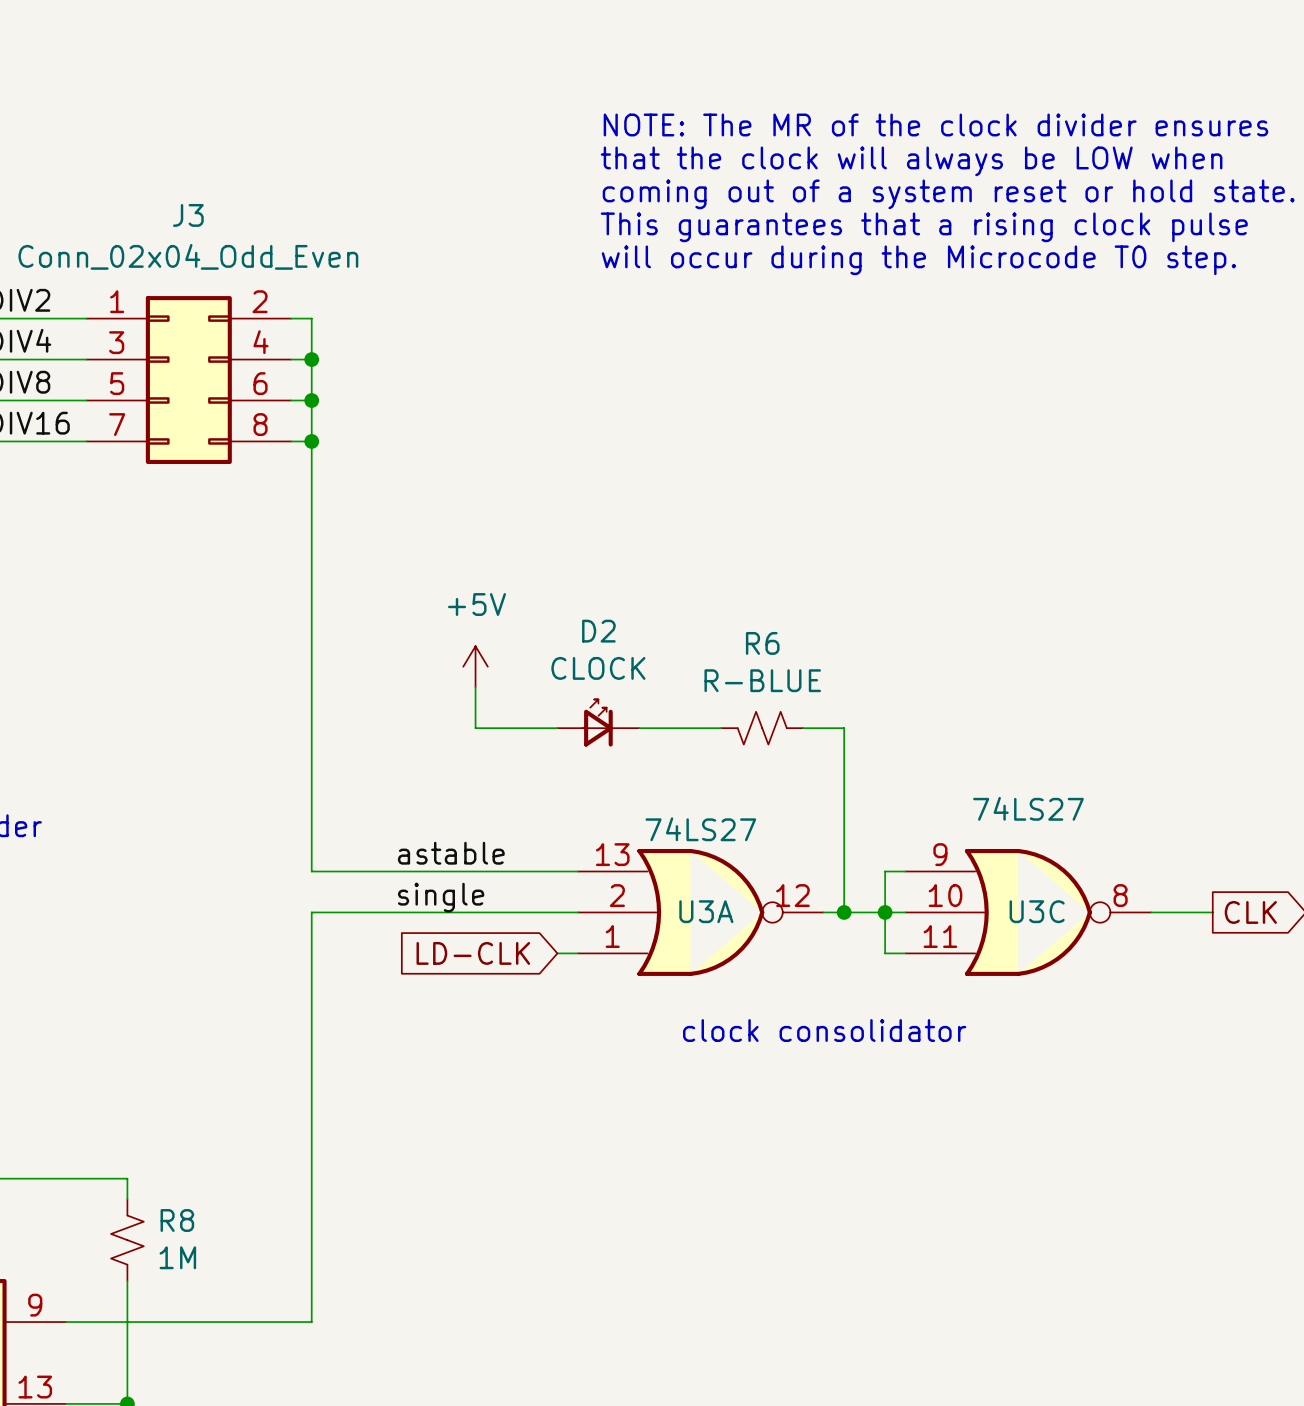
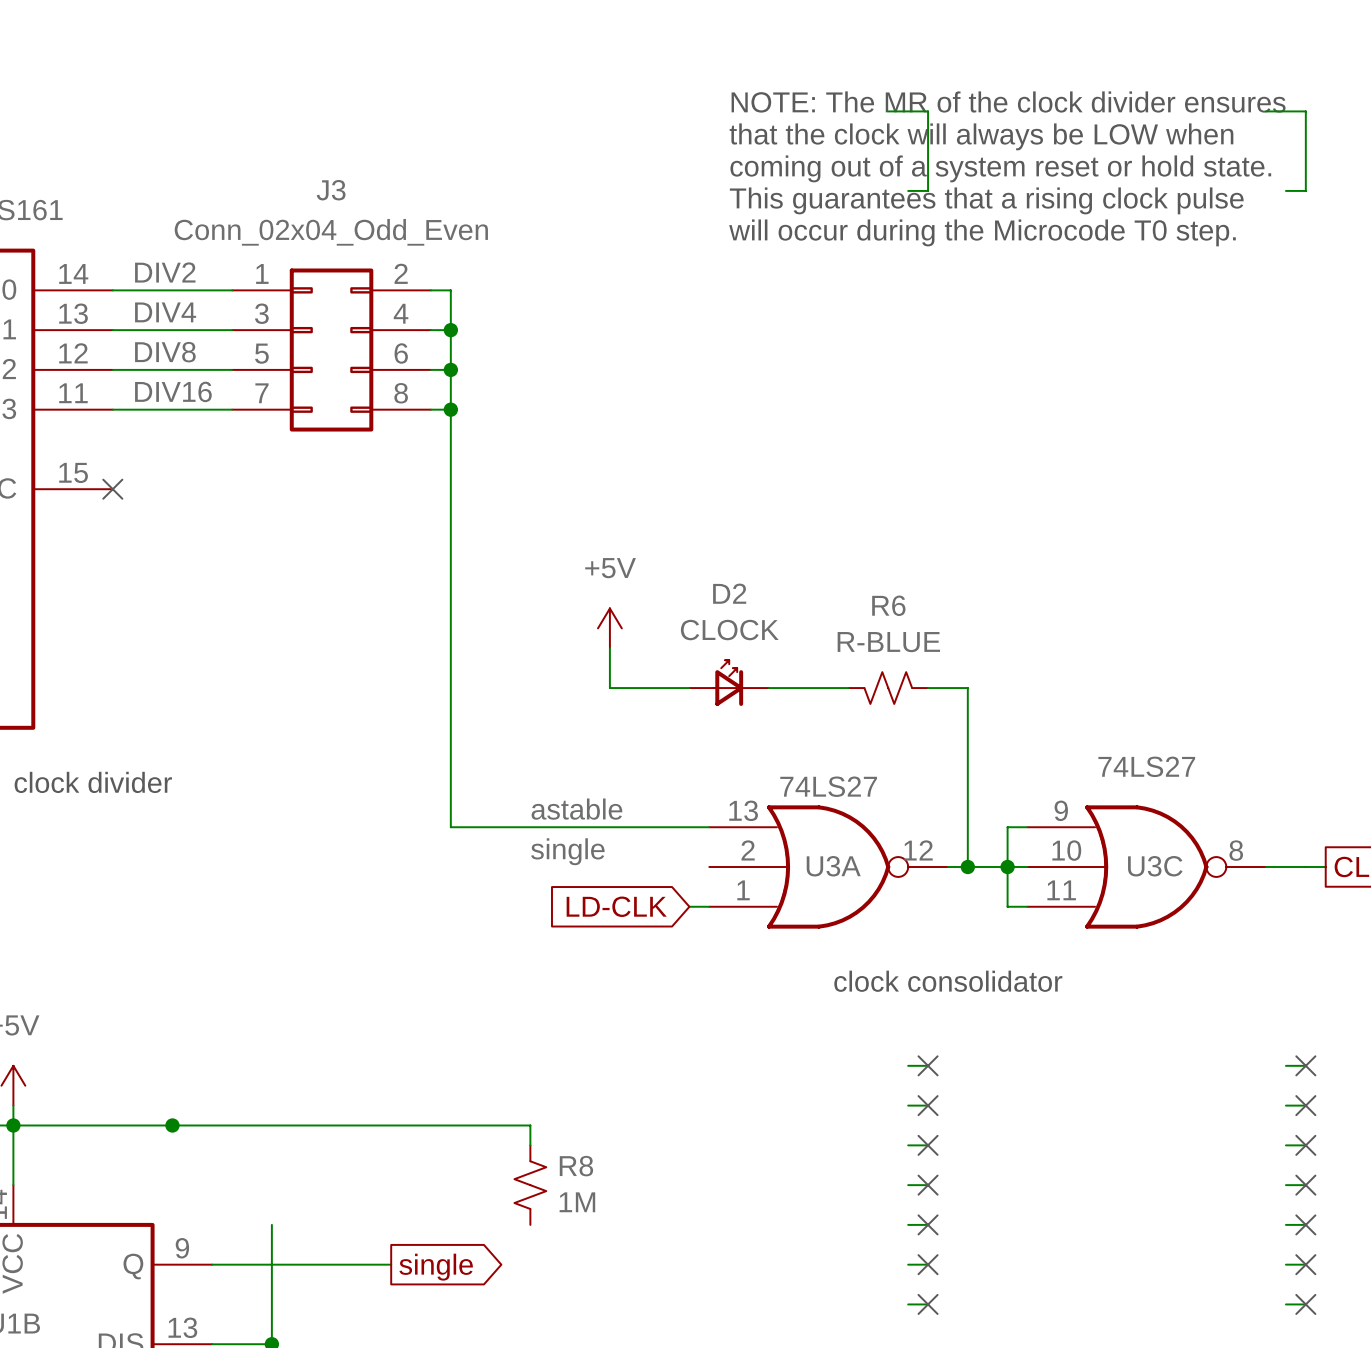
wire: none -> (888, 111) (928, 111) (928, 190) (908, 190)
wire: none -> (1266, 111) (1305, 111) (1305, 190) (1285, 190)
wire: (577, 912) (311, 912) (311, 1322) (250, 1322) -> none
wire: none -> (908, 1065) (928, 1065)
no-connect mark: none -> (928, 1065)
wire: none -> (1285, 1065) (1305, 1065)
no-connect mark: none -> (1305, 1065)
wire: none -> (908, 1105) (928, 1105)
no-connect mark: none -> (928, 1105)
wire: none -> (1285, 1105) (1305, 1105)
no-connect mark: none -> (1305, 1105)
junction: none -> (172, 1125)
wire: (127, 1178) (127, 1199) -> (271, 1125) (530, 1125) (530, 1145)
wire: none -> (908, 1145) (928, 1145)
no-connect mark: none -> (928, 1145)
wire: none -> (1285, 1145) (1305, 1145)
no-connect mark: none -> (1305, 1145)
R8 position: (127, 1240) -> (530, 1185)
wire: none -> (908, 1185) (928, 1185)
no-connect mark: none -> (928, 1185)
wire: none -> (1285, 1185) (1305, 1185)
no-connect mark: none -> (1305, 1185)
wire: none -> (908, 1224) (928, 1224)
no-connect mark: none -> (928, 1224)
wire: none -> (1285, 1224) (1305, 1224)
no-connect mark: none -> (1305, 1224)
wire: none -> (908, 1264) (928, 1264)
no-connect mark: none -> (928, 1264)
wire: none -> (1285, 1264) (1305, 1264)
no-connect mark: none -> (1305, 1264)
global label: none -> single (436, 1267)
wire: none -> (908, 1304) (928, 1304)
no-connect mark: none -> (928, 1304)
wire: none -> (1285, 1304) (1305, 1304)
no-connect mark: none -> (1305, 1304)

